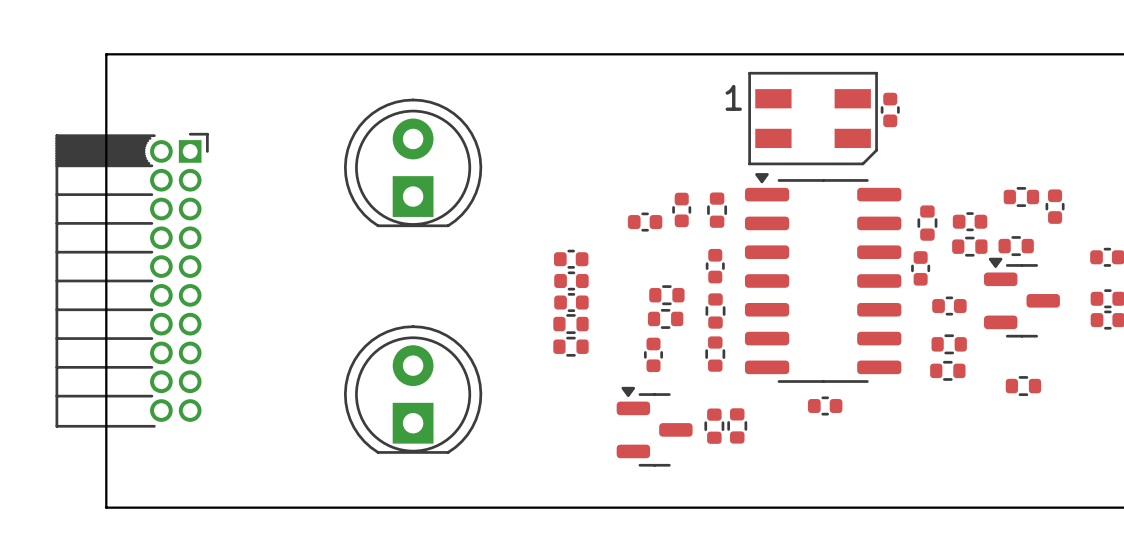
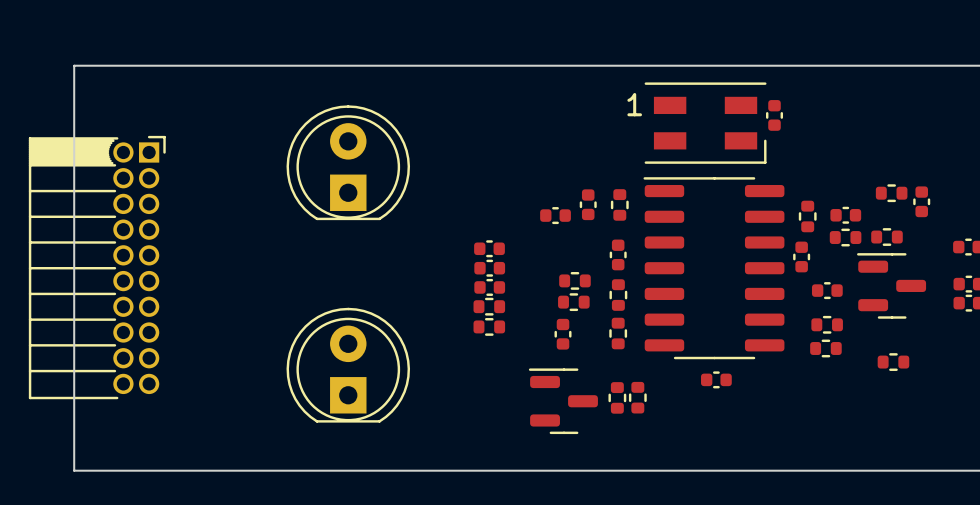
part footprint: [748, 71, 878, 166] -> [644, 82, 767, 164]
part footprint: [744, 173, 902, 383] -> [643, 177, 785, 360]
part footprint: [983, 257, 1060, 338] -> [857, 253, 927, 319]
part footprint: [616, 386, 693, 467] -> [528, 368, 598, 435]

